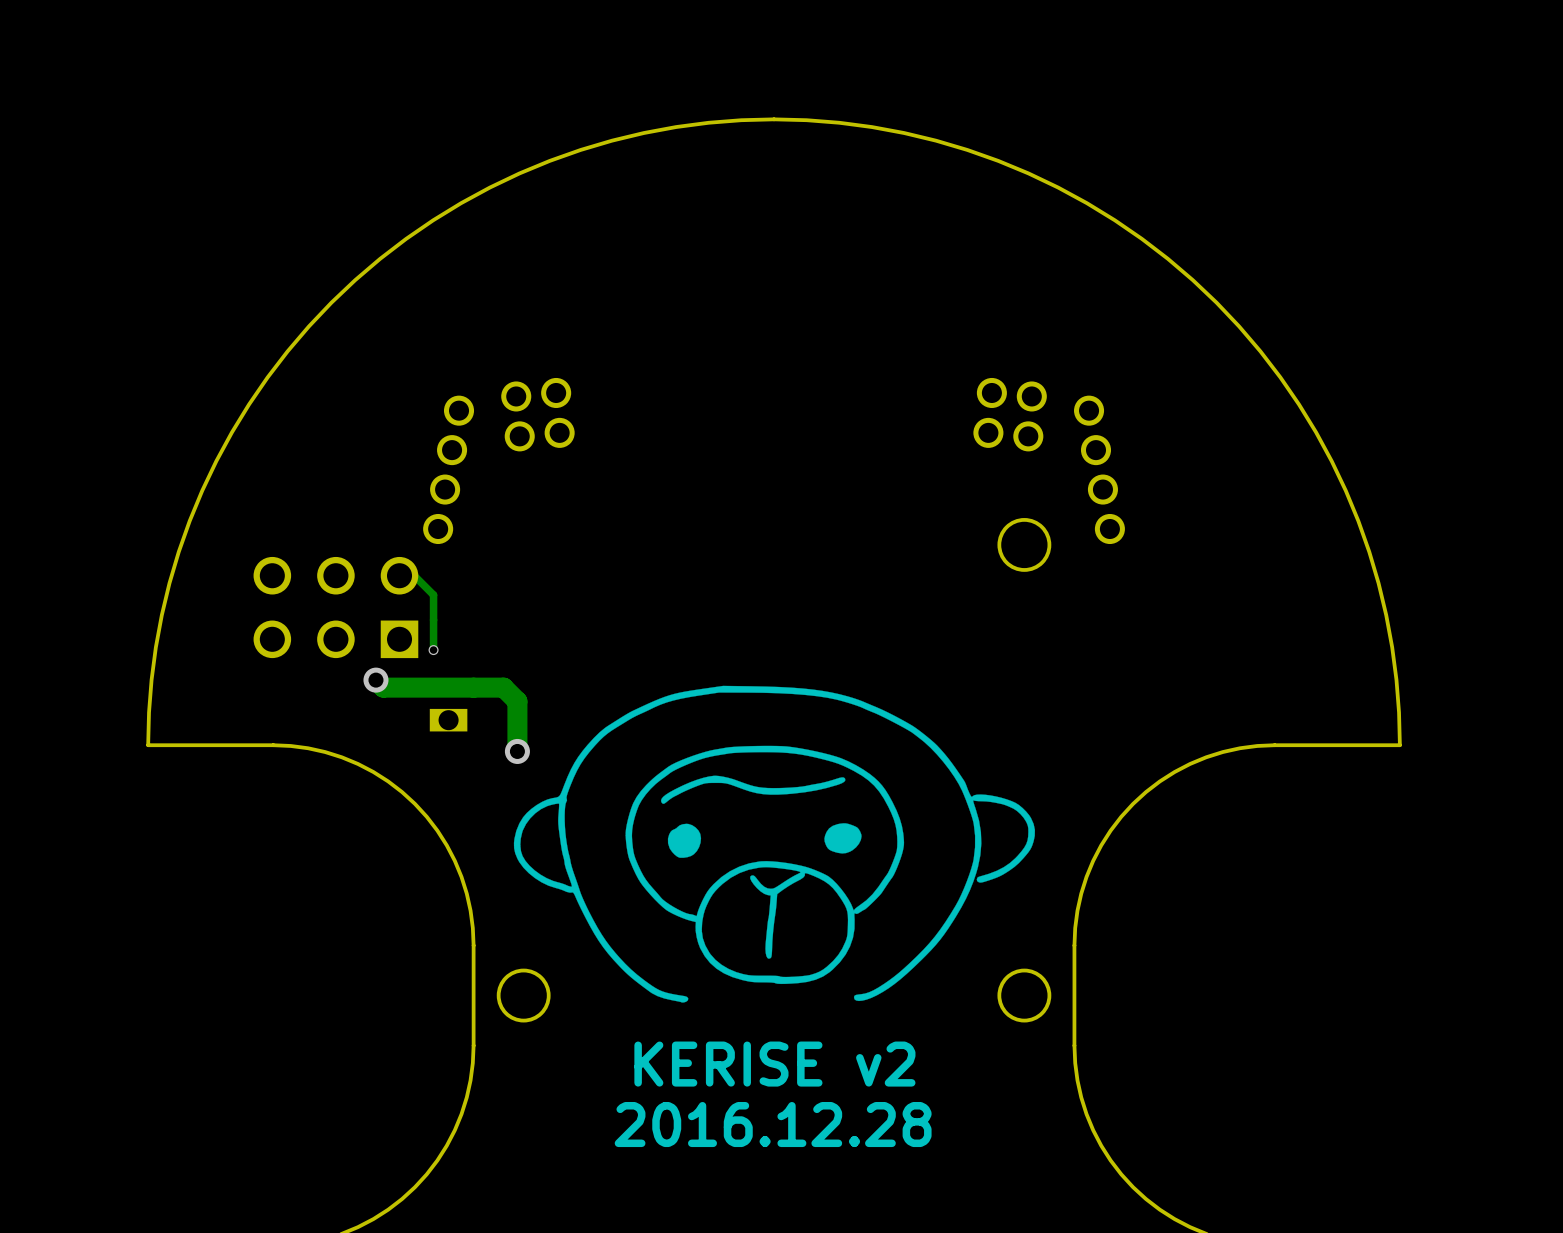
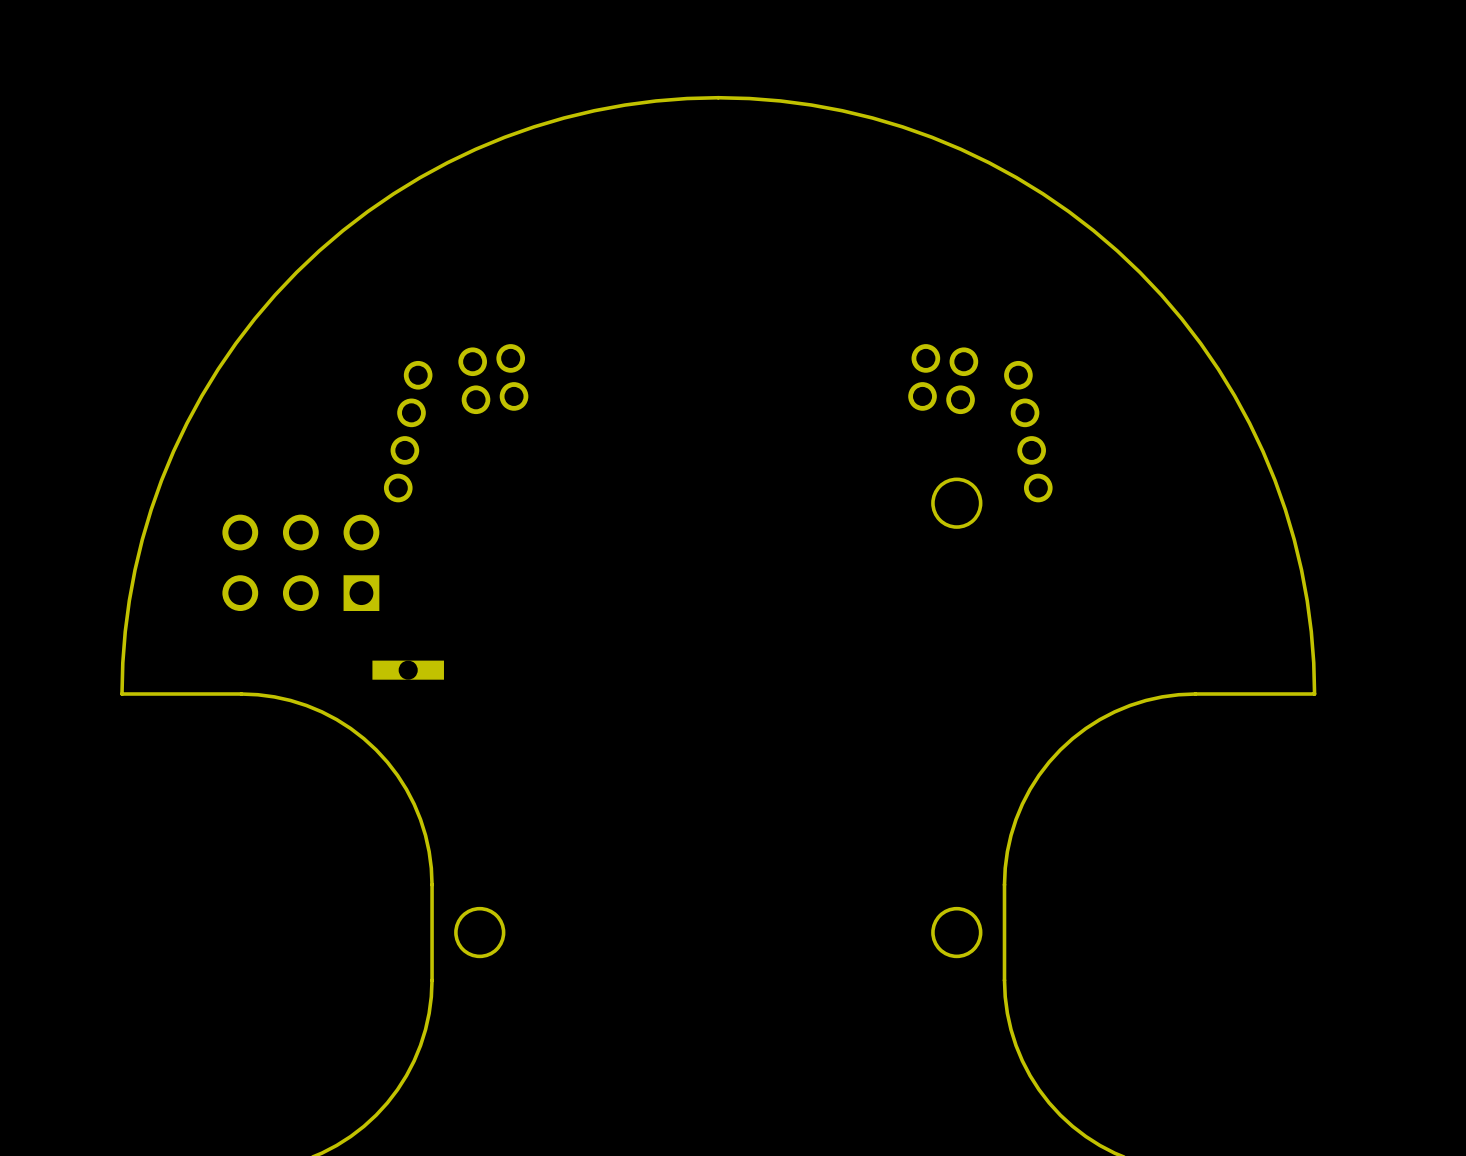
track: (399, 575) (414, 575) (433, 595) (433, 650) -> none
via: (433, 650) -> none
track: (375, 680) (383, 687) (503, 687) (517, 701) (517, 751) -> none
via: (375, 680) -> none
drawing: [513, 685, 1035, 1003] -> none
part footprint: [429, 708, 468, 732] -> [372, 660, 444, 680]
via: (517, 751) -> none
text: KERISE v2 (774, 1064) -> none
text: 2016.12.28 (773, 1124) -> none

